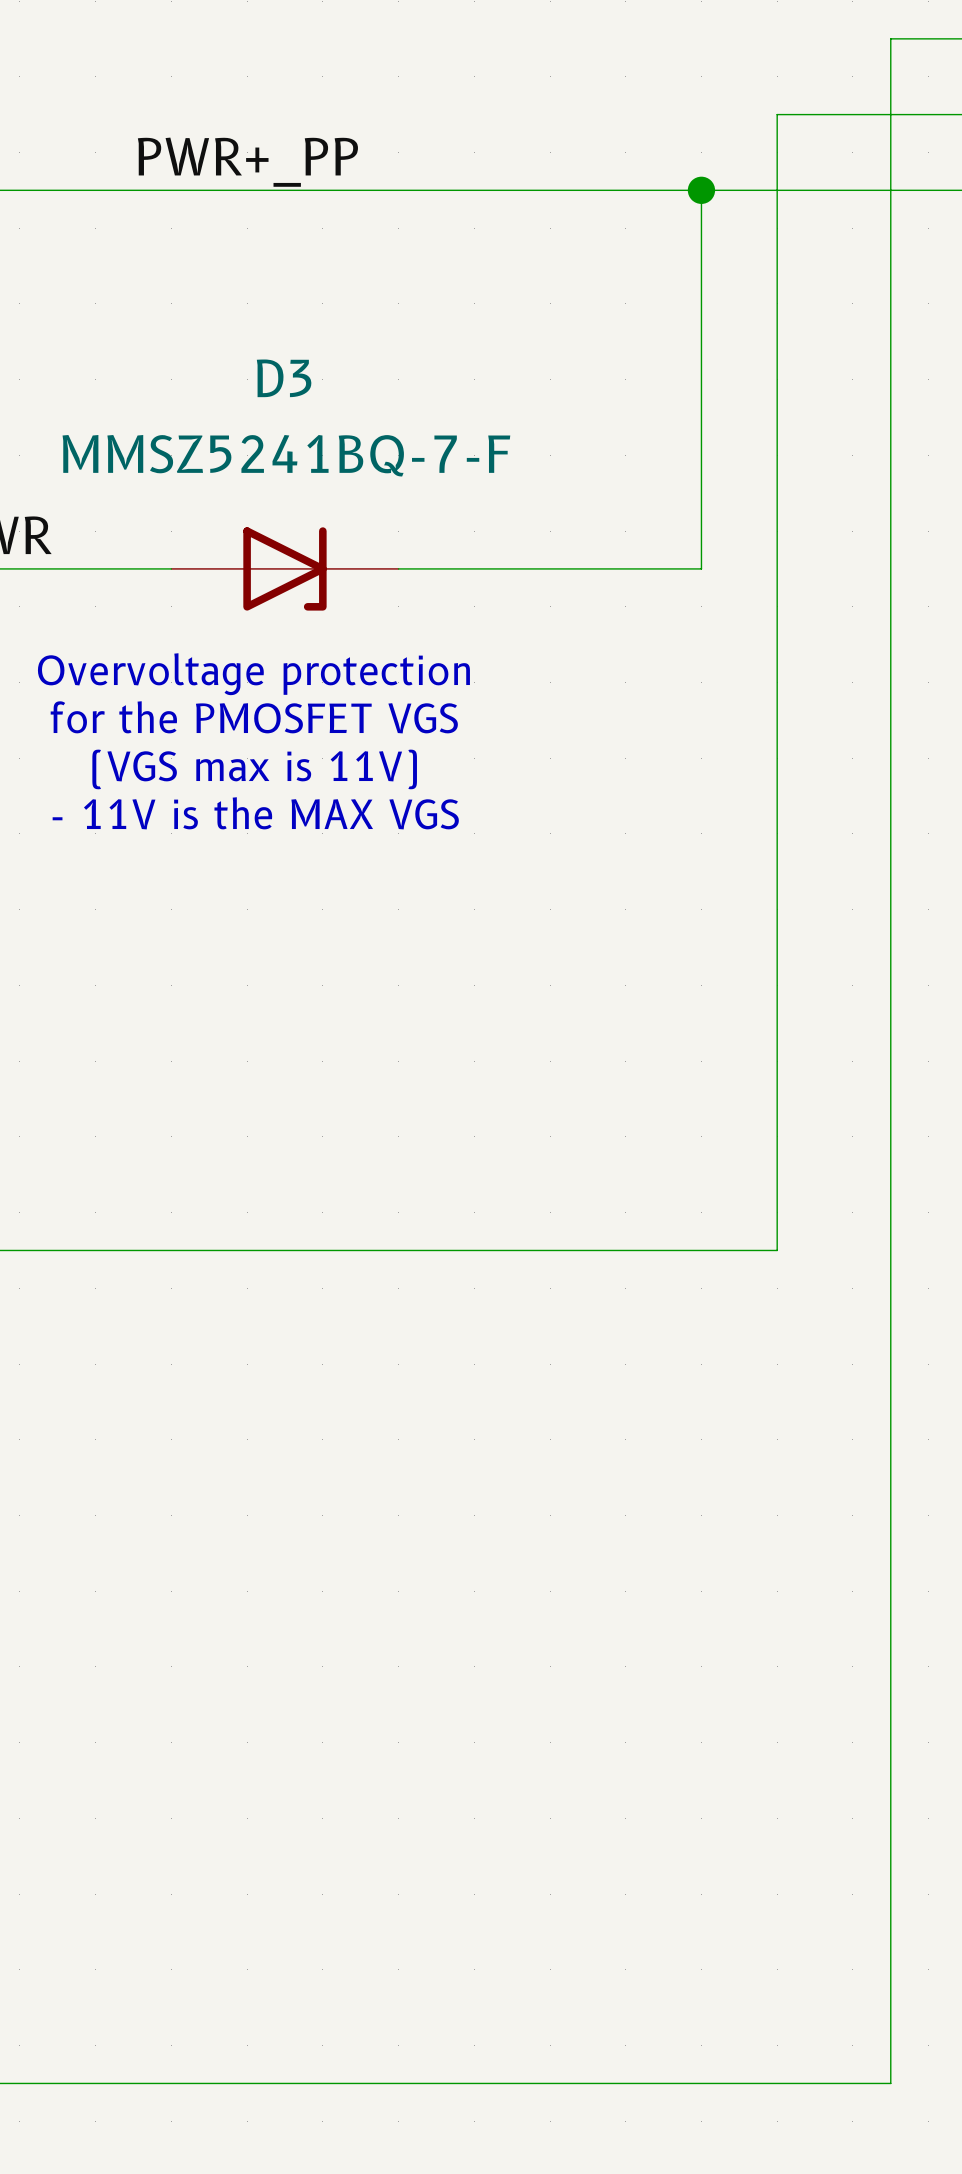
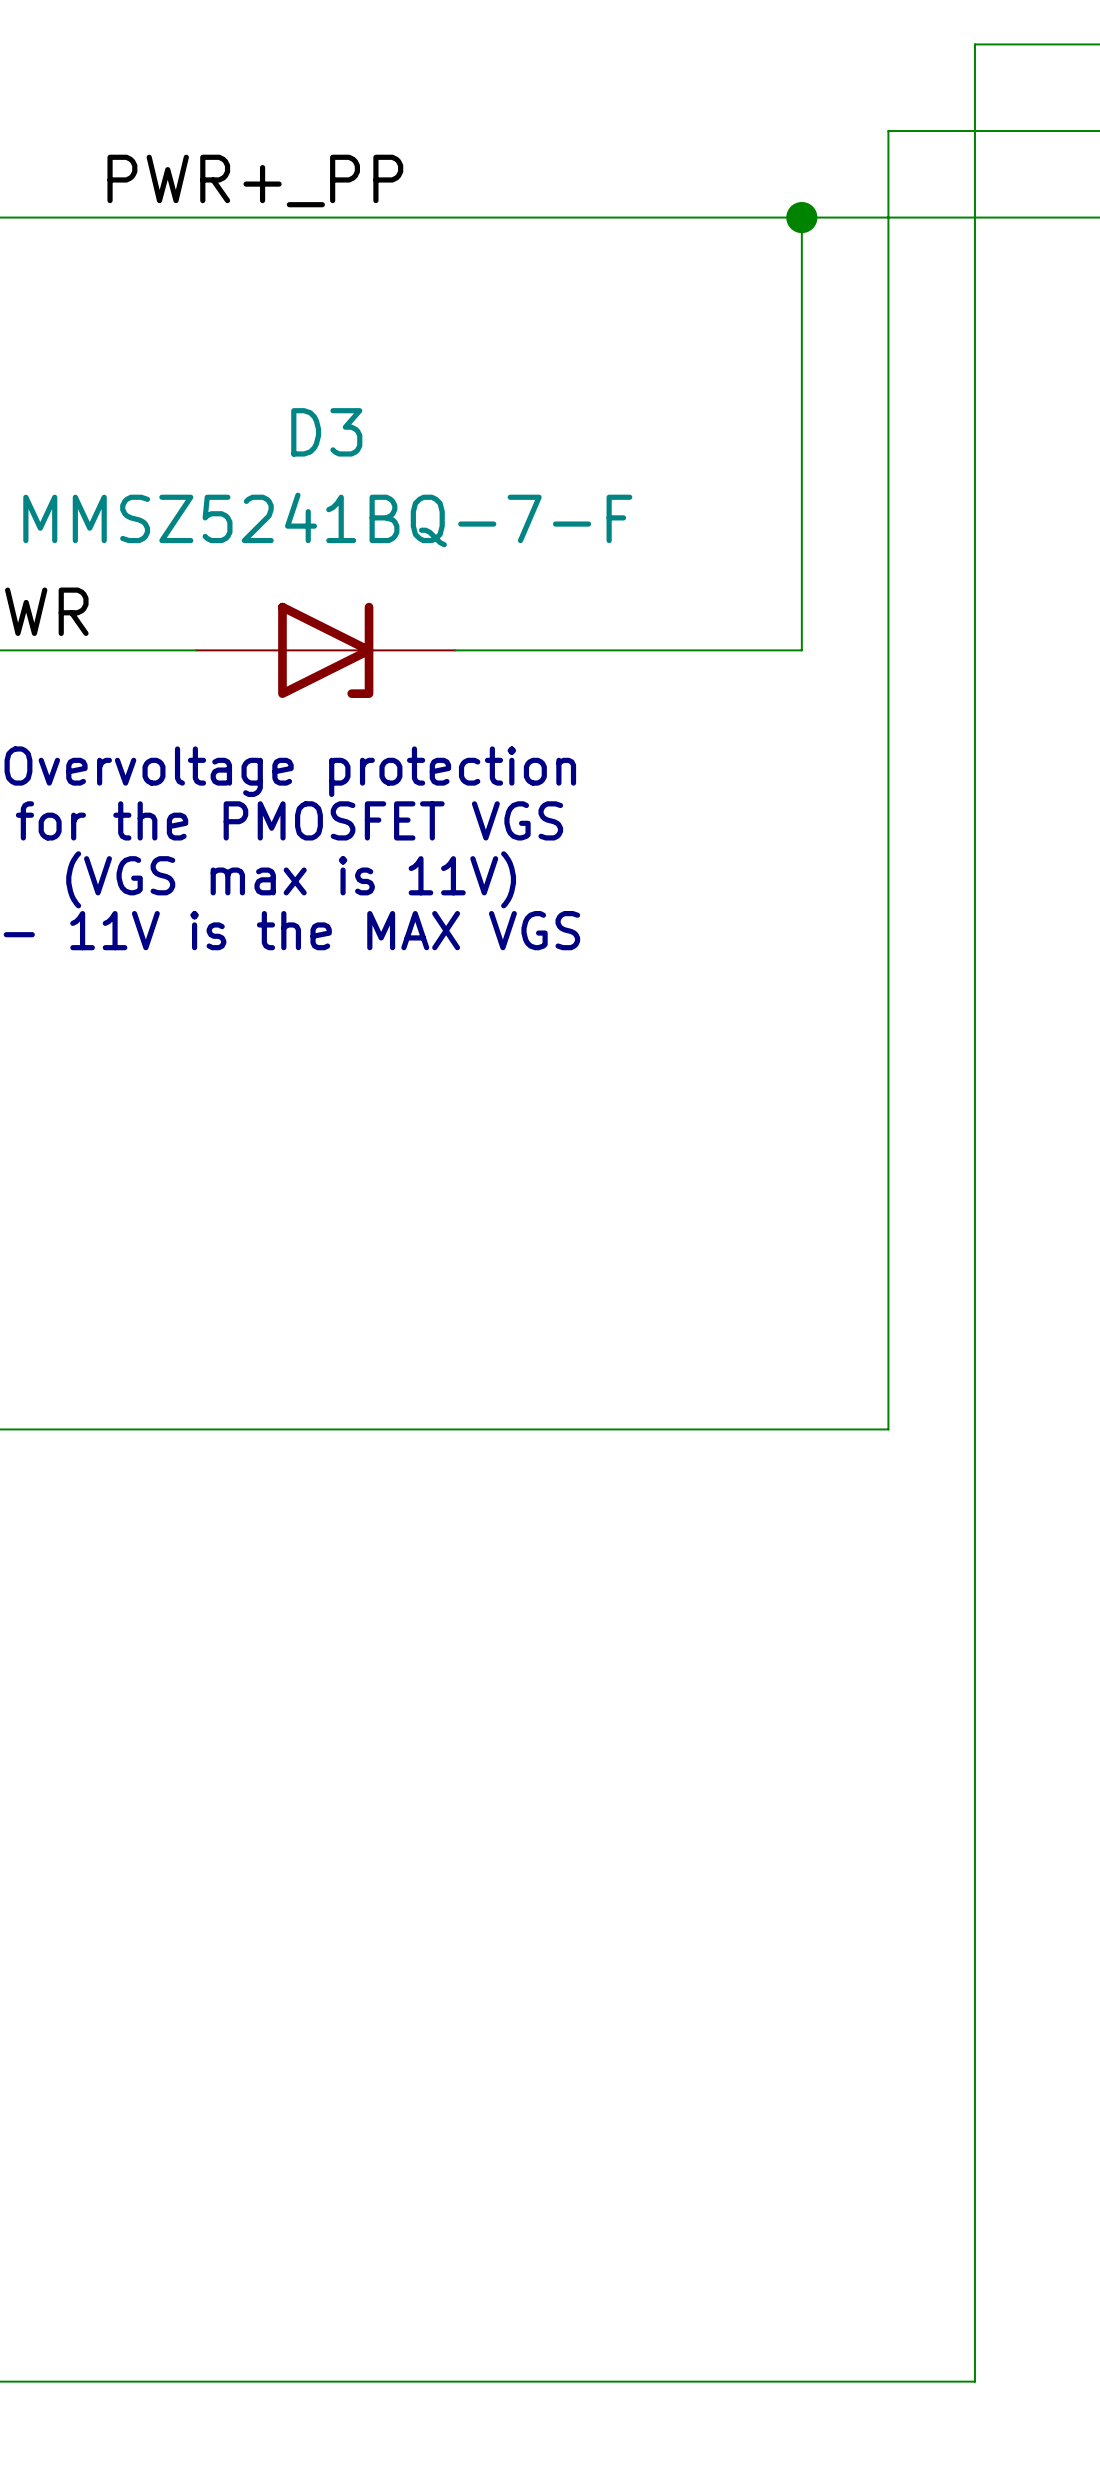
wire: (890, 38) (890, 2083) (852, 2083) -> (1018, 44) (974, 44) (974, 2381)

